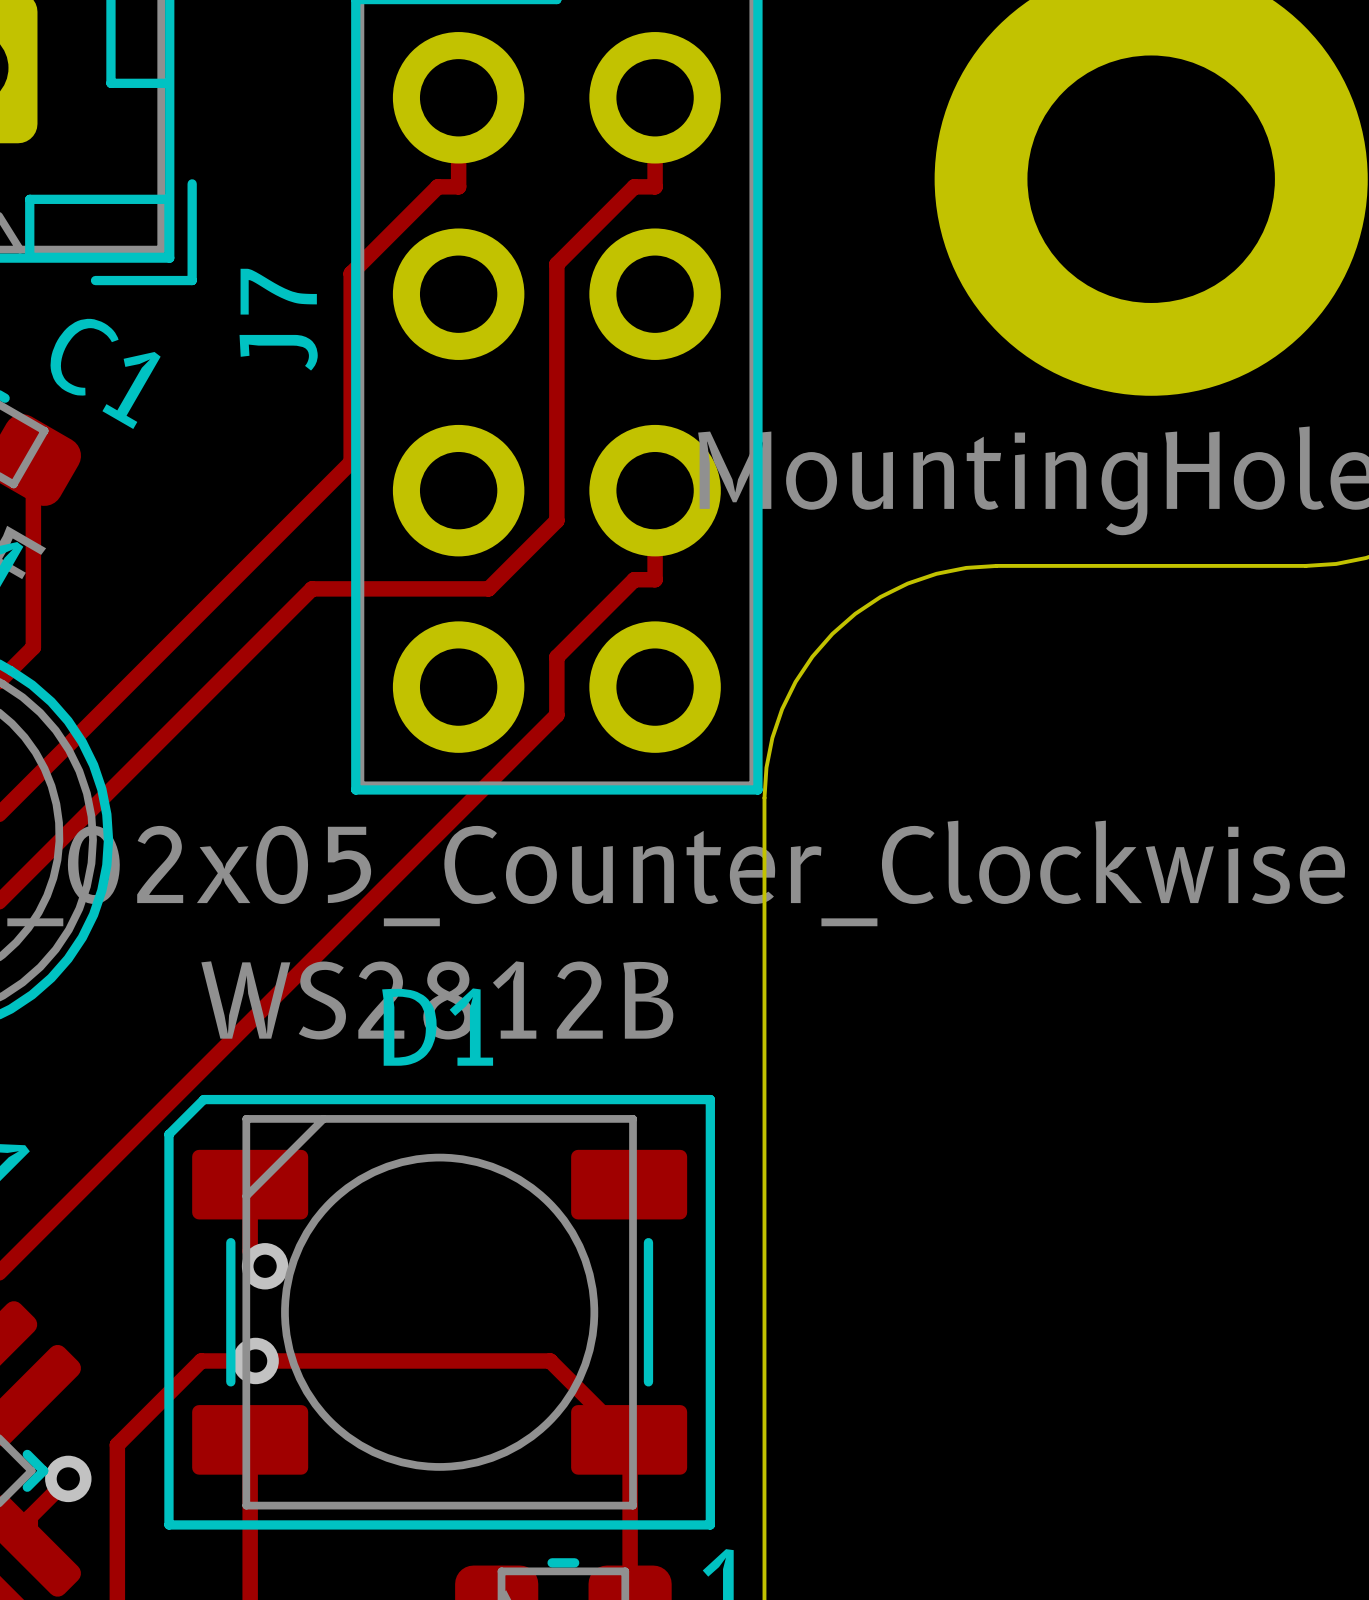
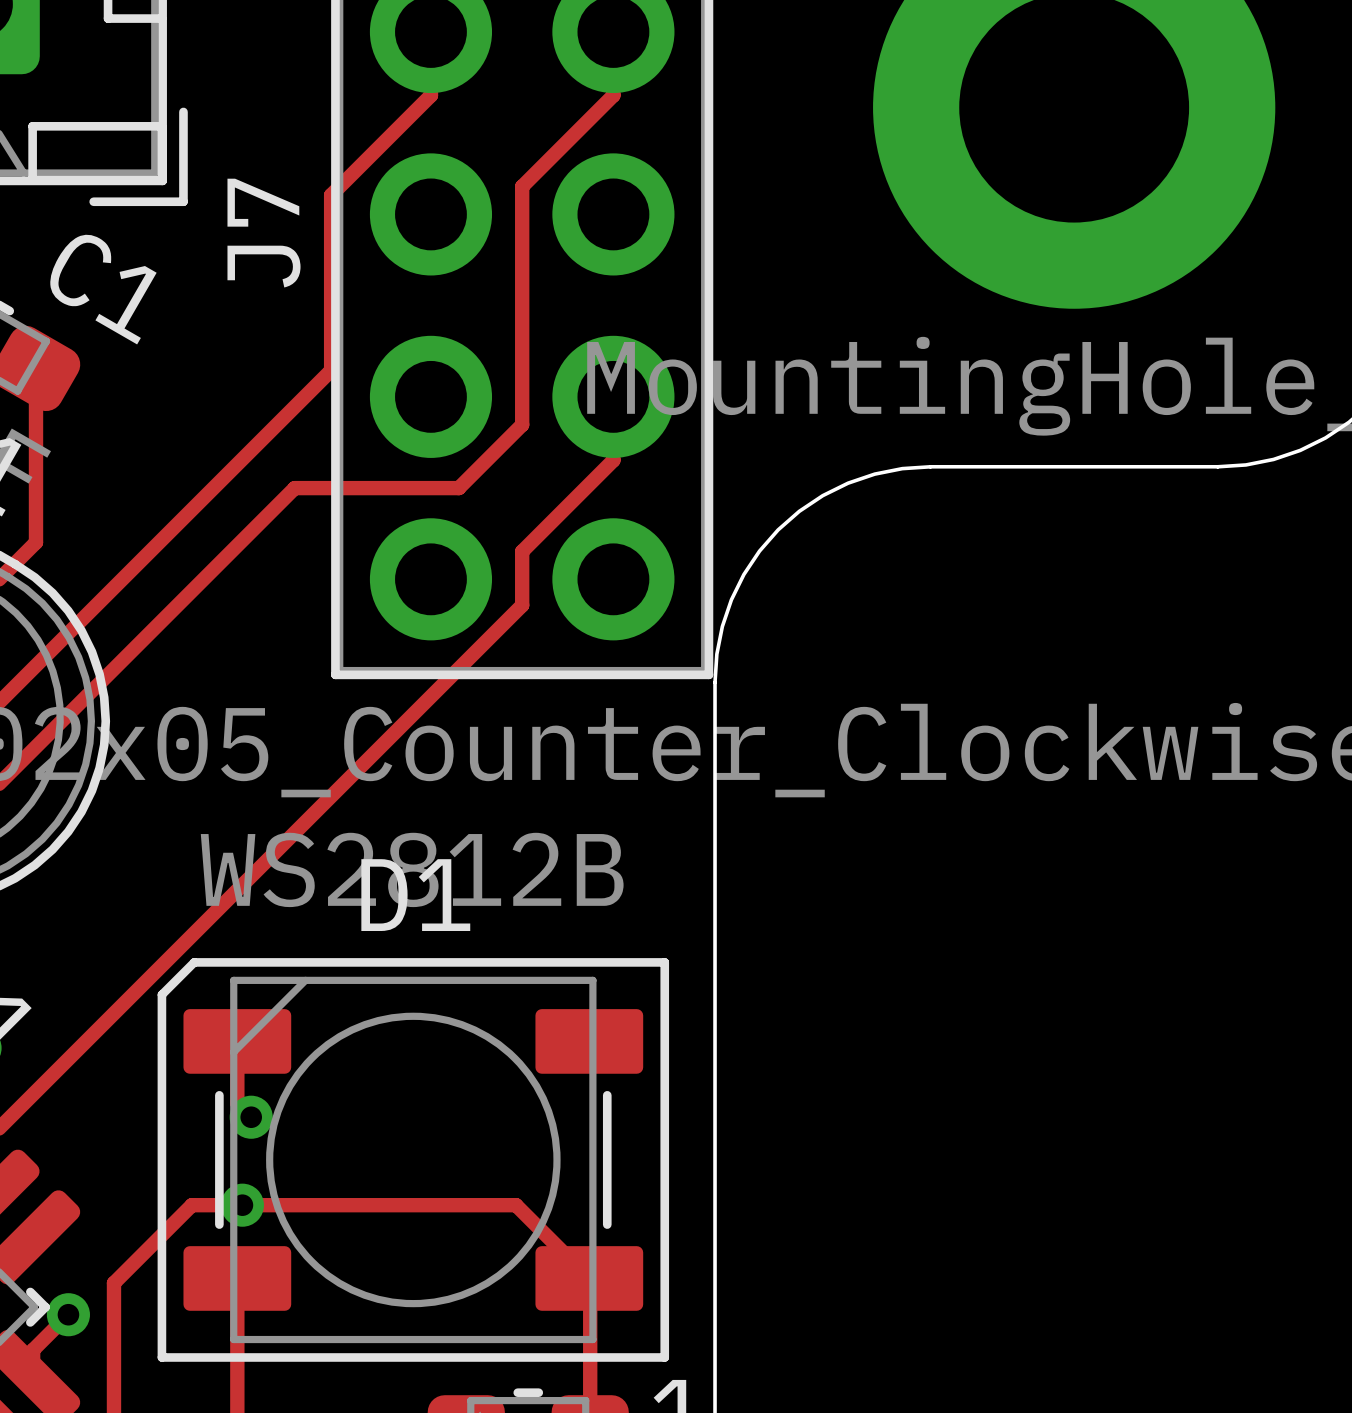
top track: (458, 166) (458, 186) (437, 186) -> (430, 95) (411, 114)
top track: (655, 166) (655, 186) (634, 186) -> (613, 95) (594, 114)
top track: (655, 558) (655, 579) (634, 579) -> (613, 460) (594, 479)

